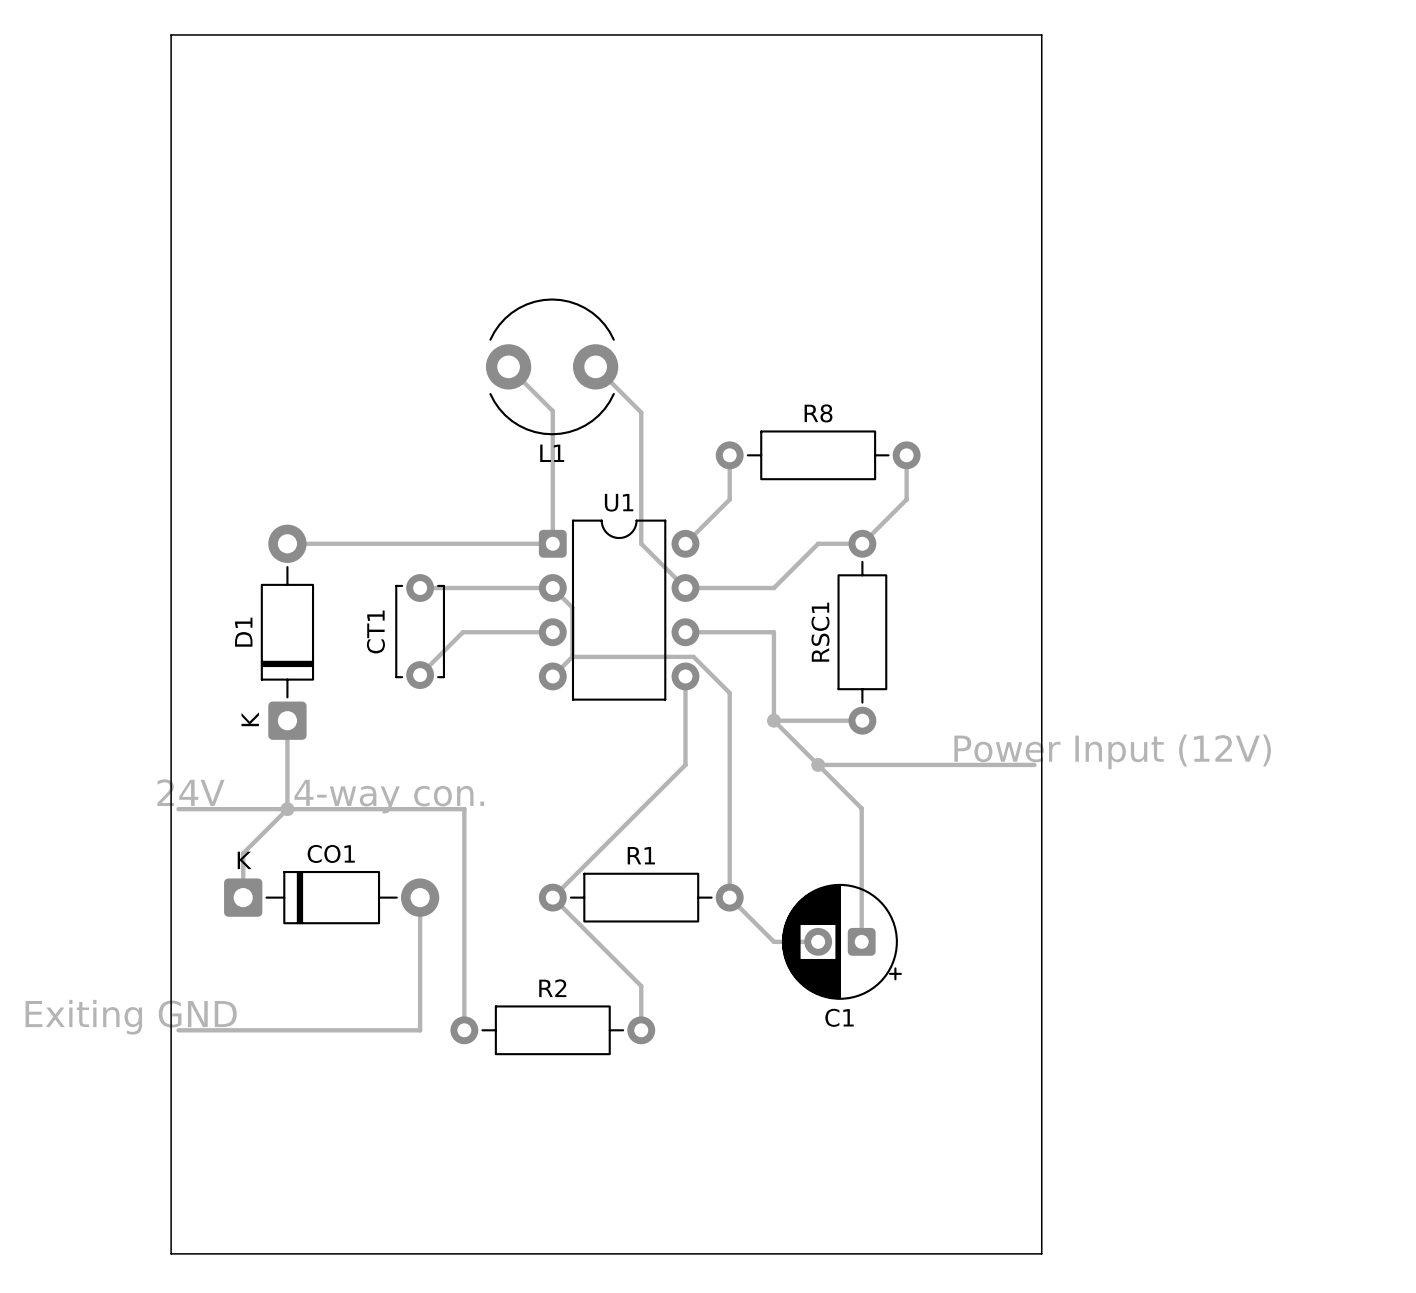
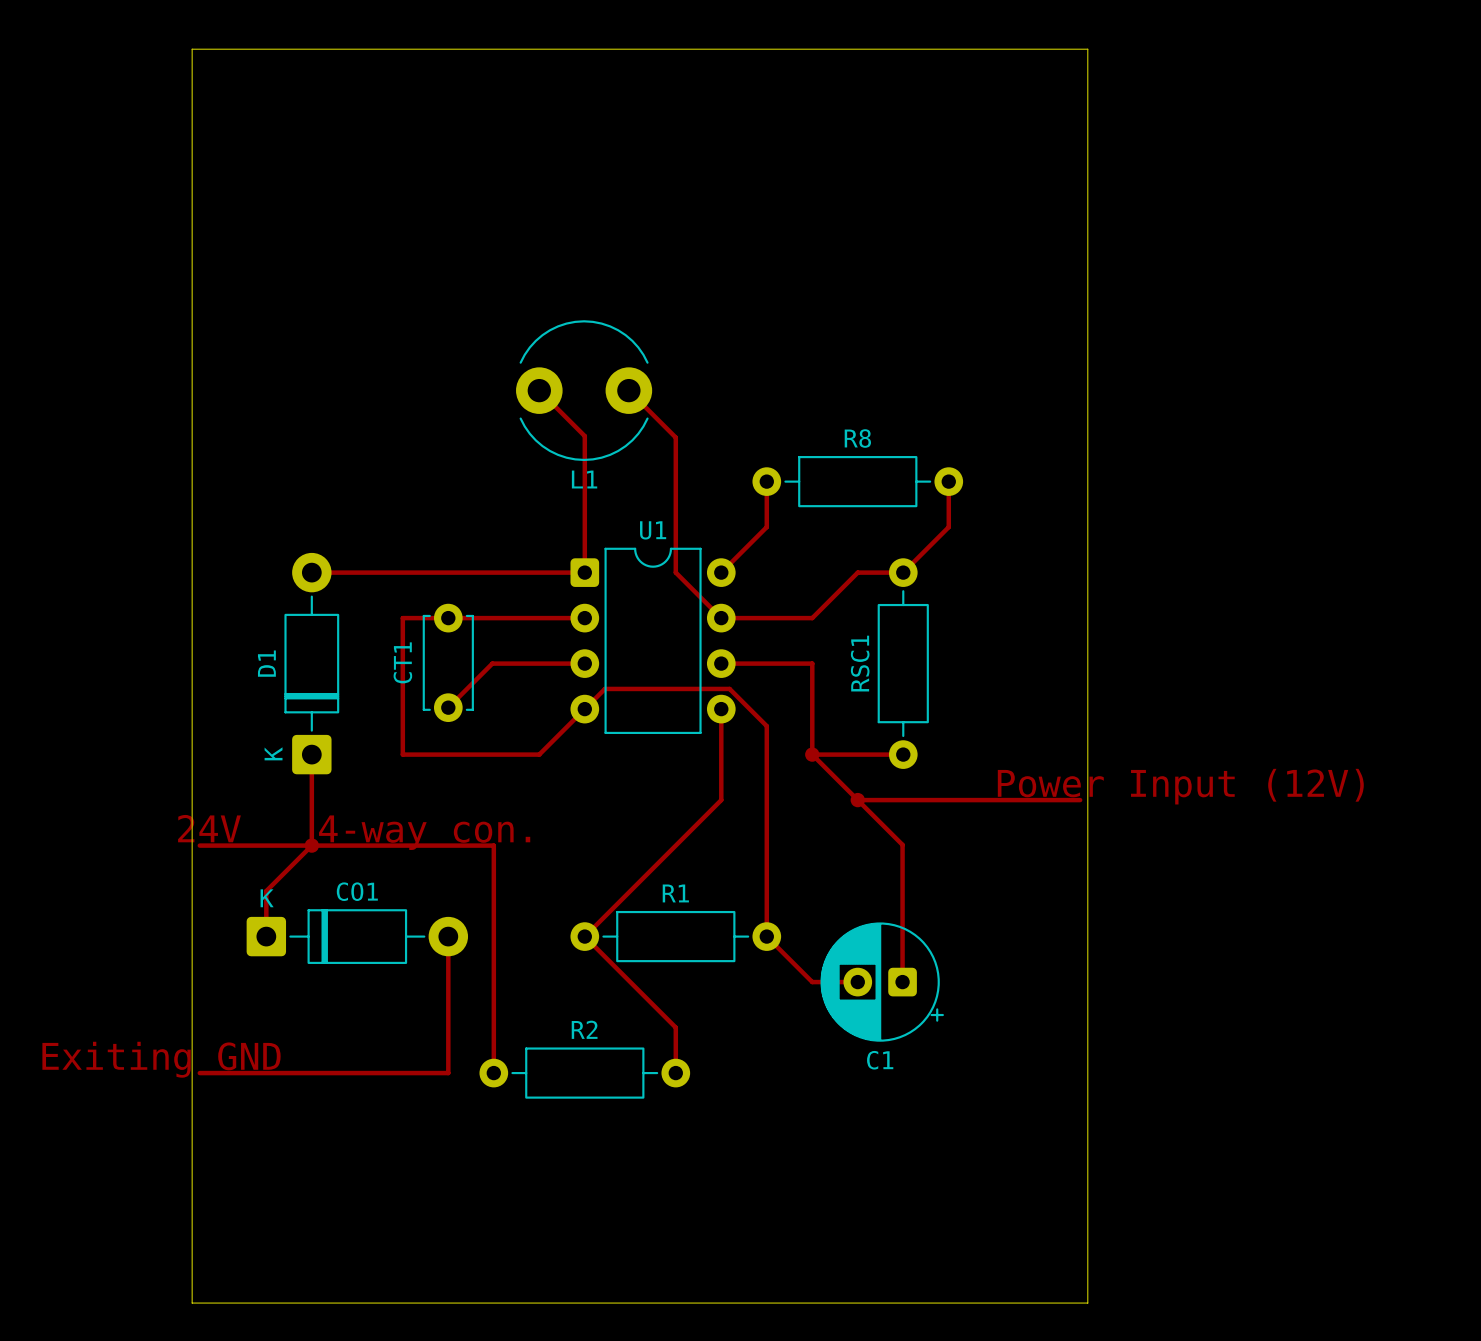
track: none -> (448, 618) (402, 618) (402, 754) (539, 754) (584, 709)
track: (552, 588) (572, 607) (572, 656) -> none

